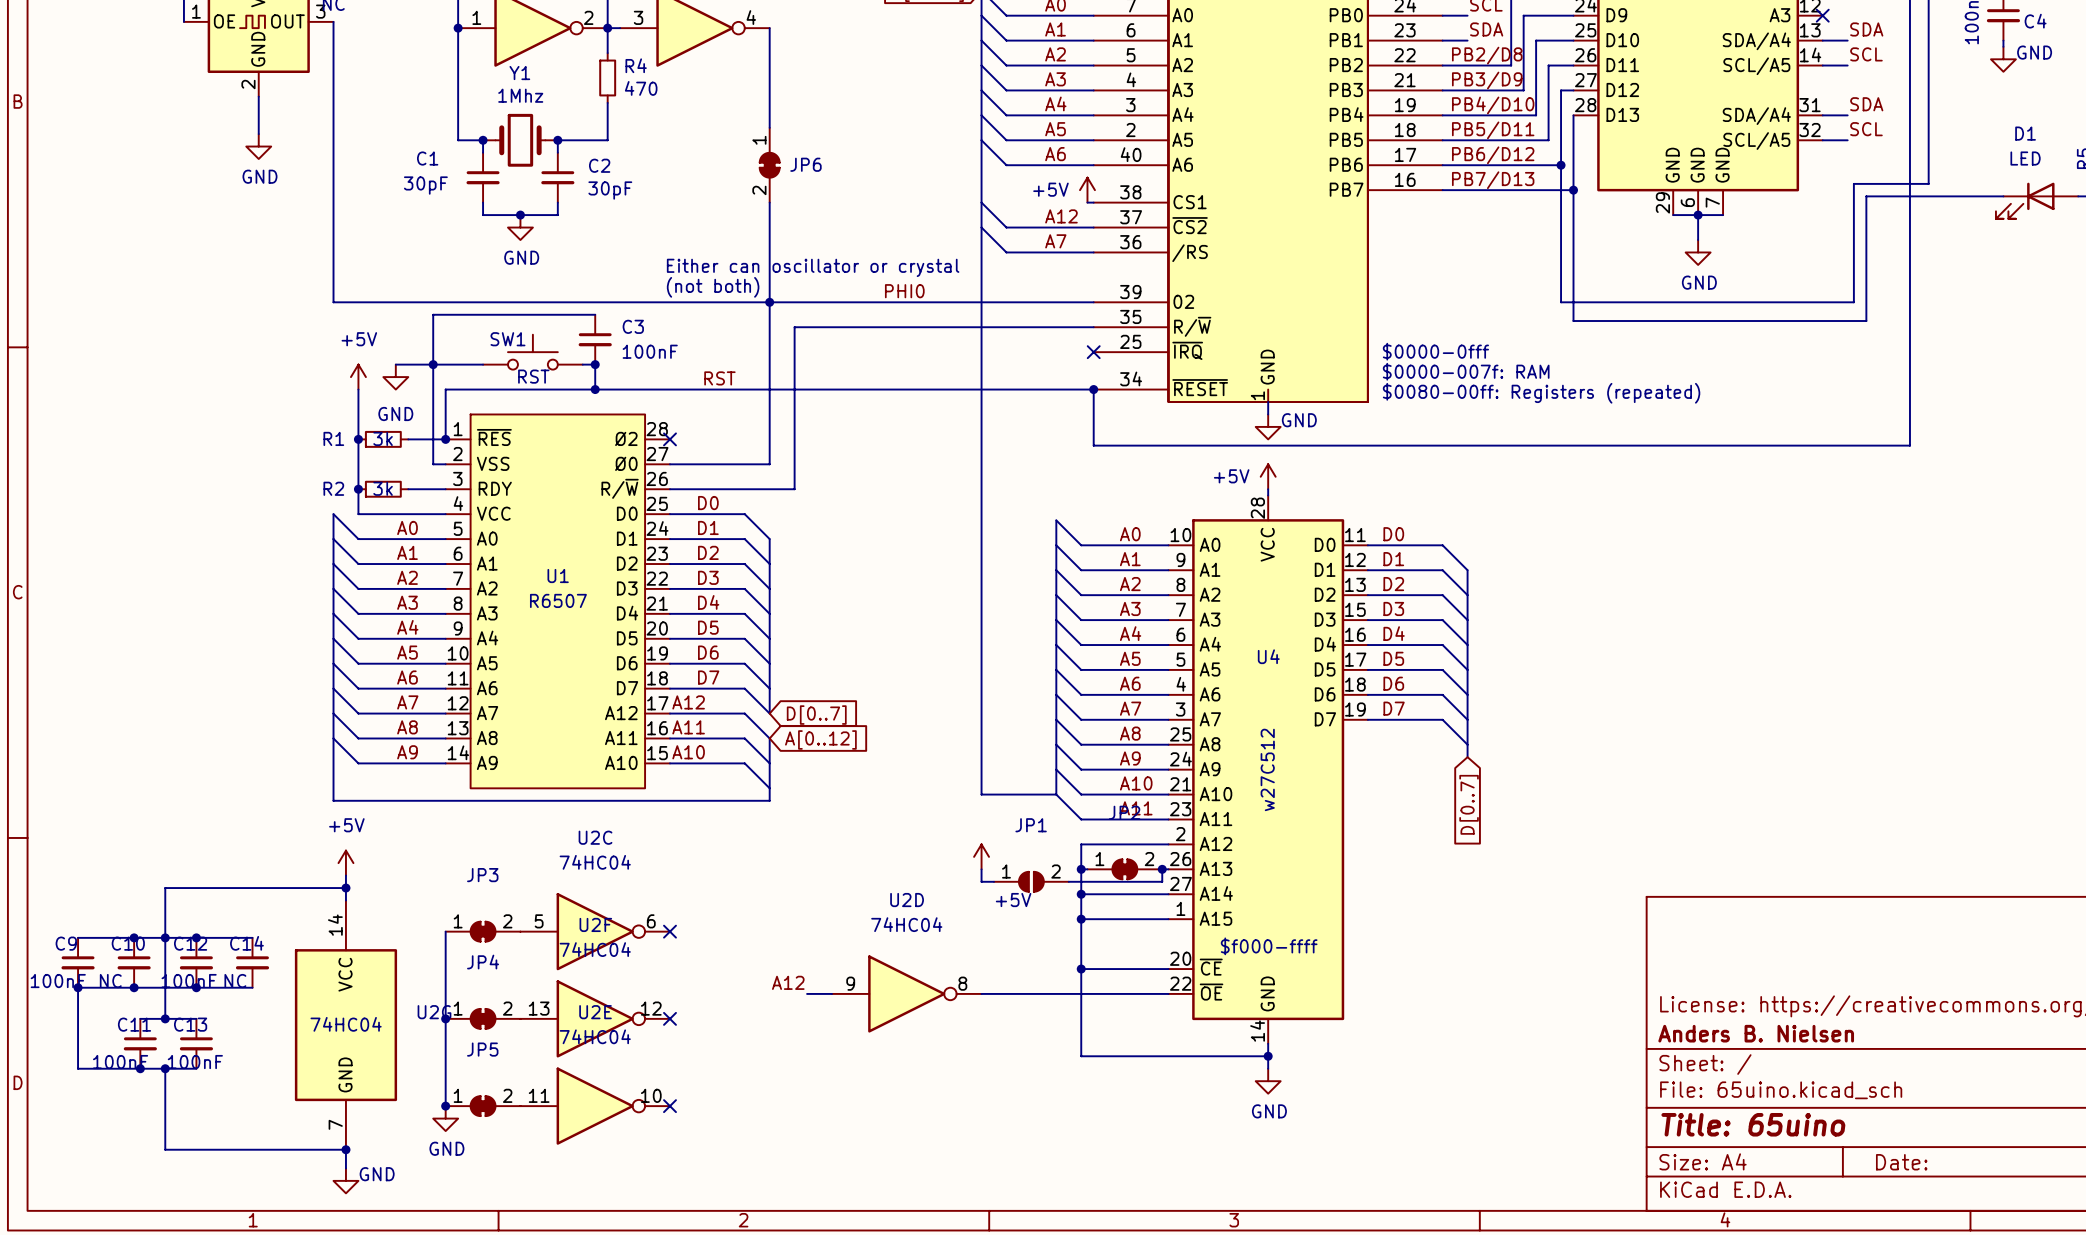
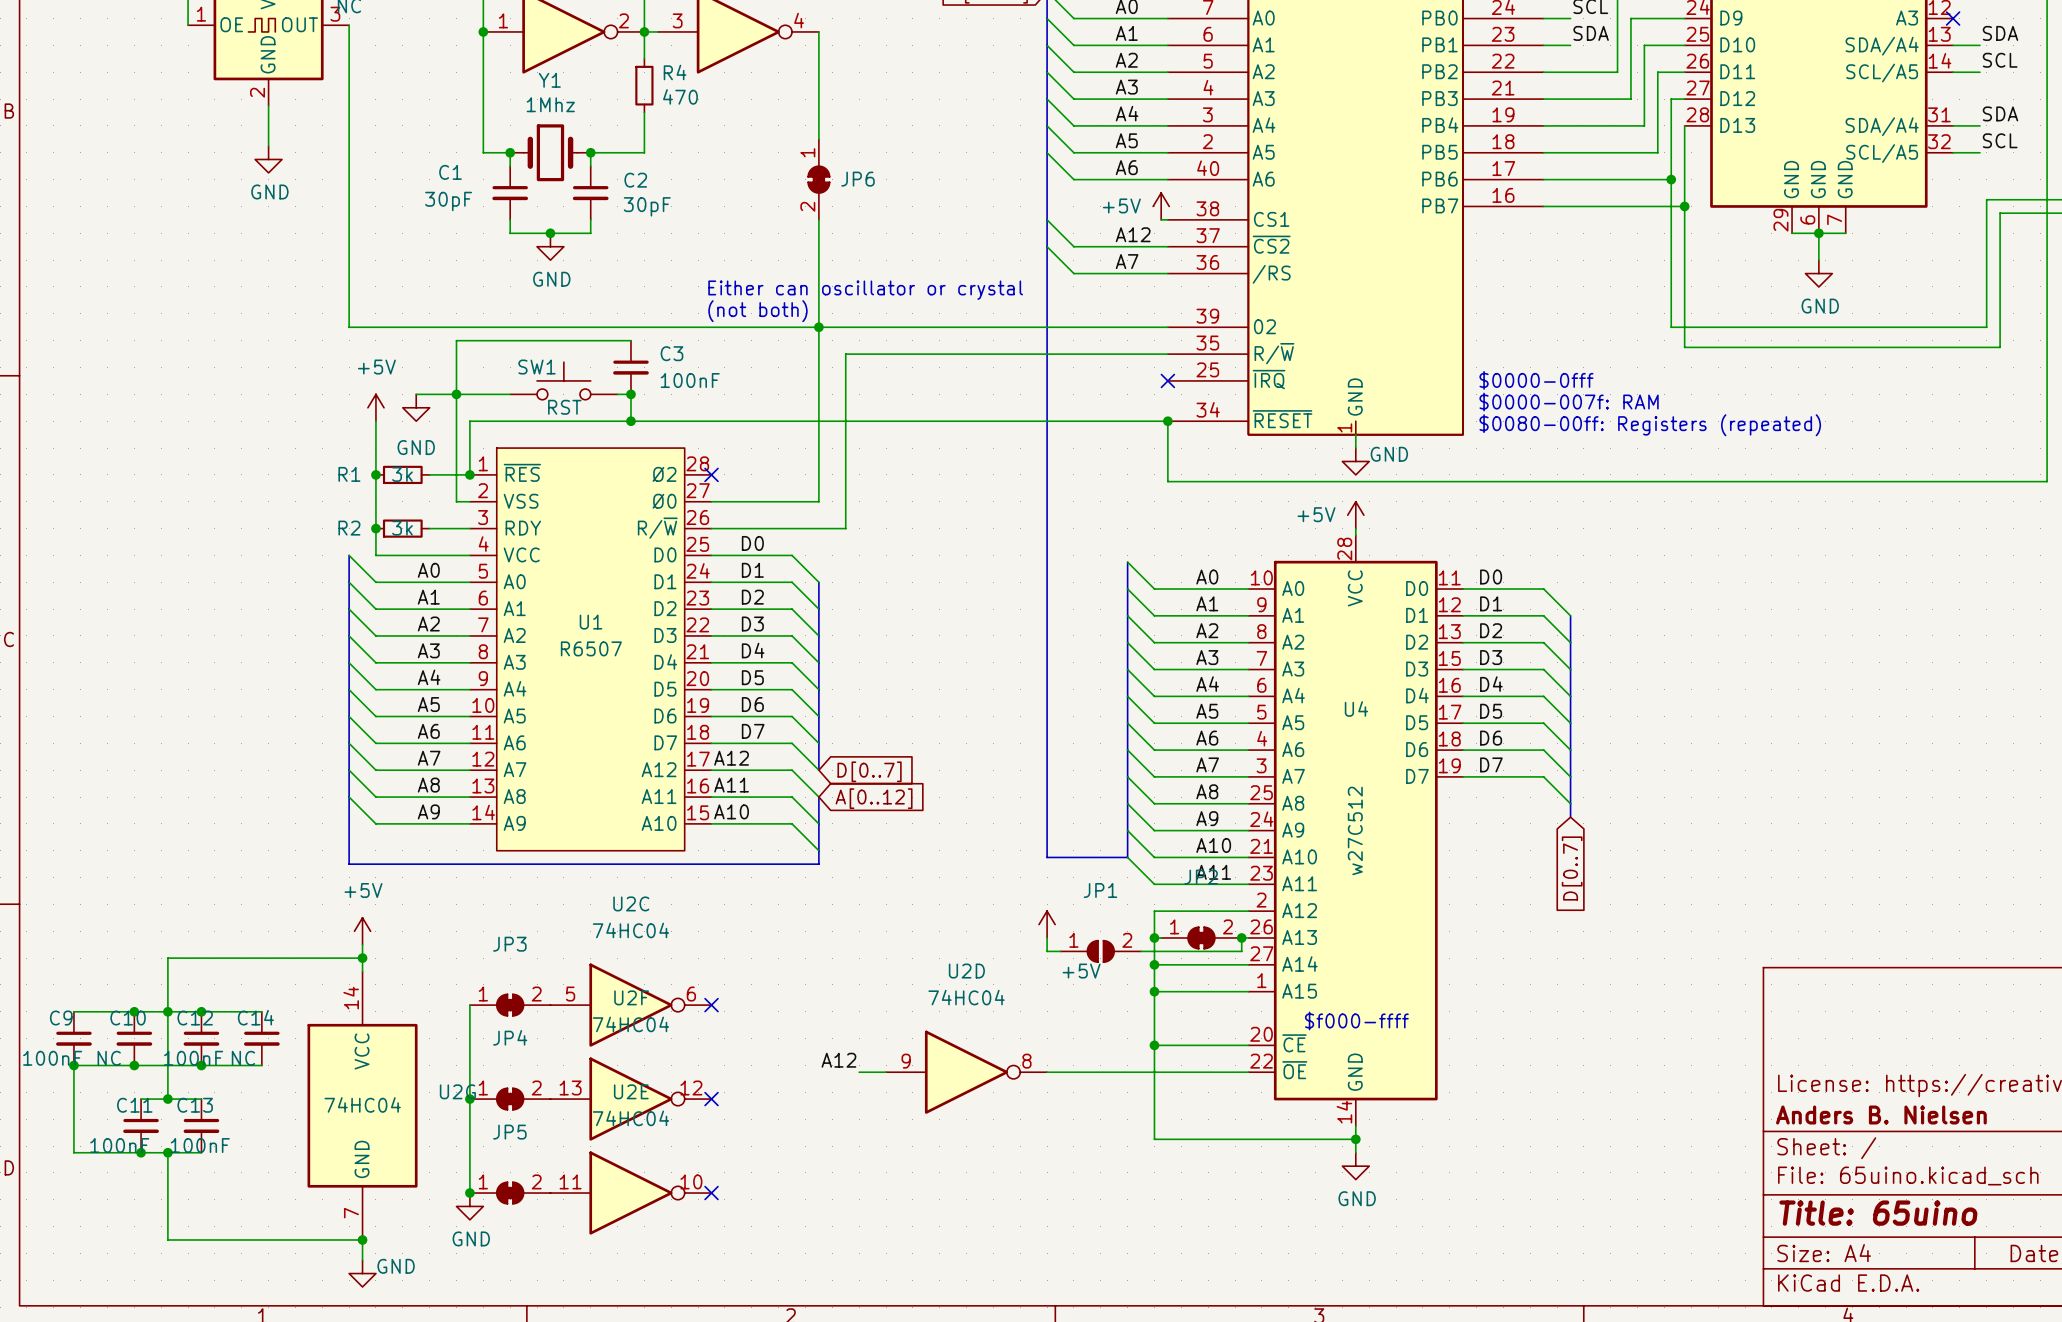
label: PB2/D8 (1487, 55) -> none
label: PB3/D9 (1487, 80) -> none
label: PB4/D10 (1493, 105) -> none
label: PB5/D11 (1493, 130) -> none
label: PB6/D12 (1493, 155) -> none
label: PB7/D13 (1493, 180) -> none
label: PHI0 (904, 291) -> none
label: RST (719, 378) -> none

